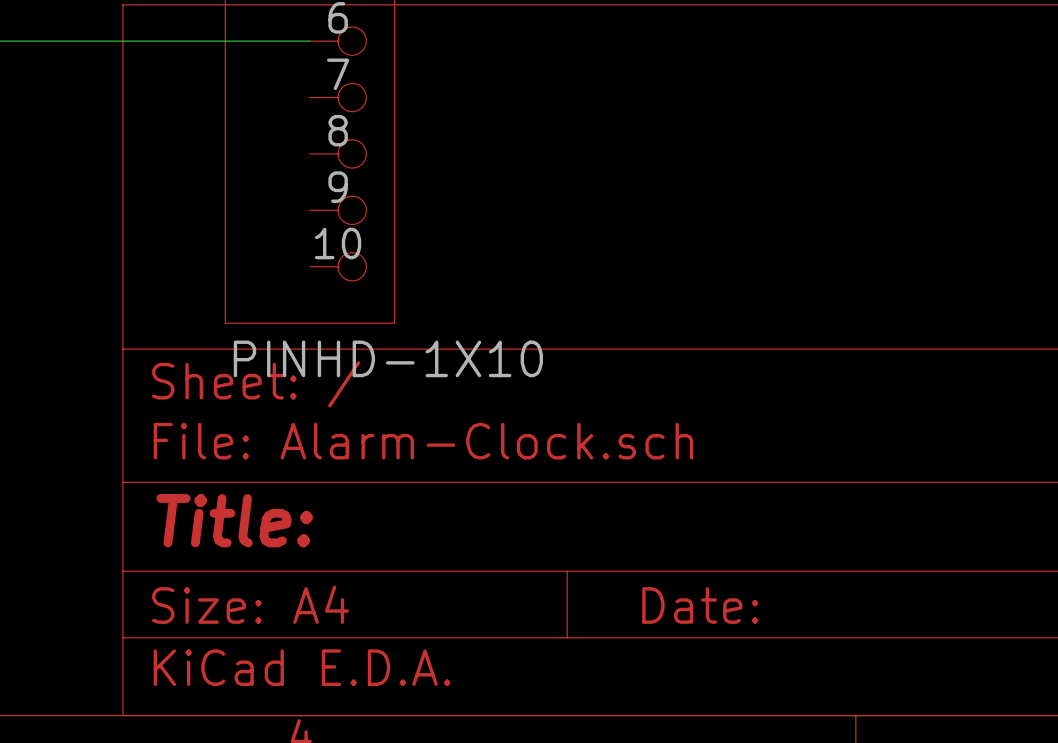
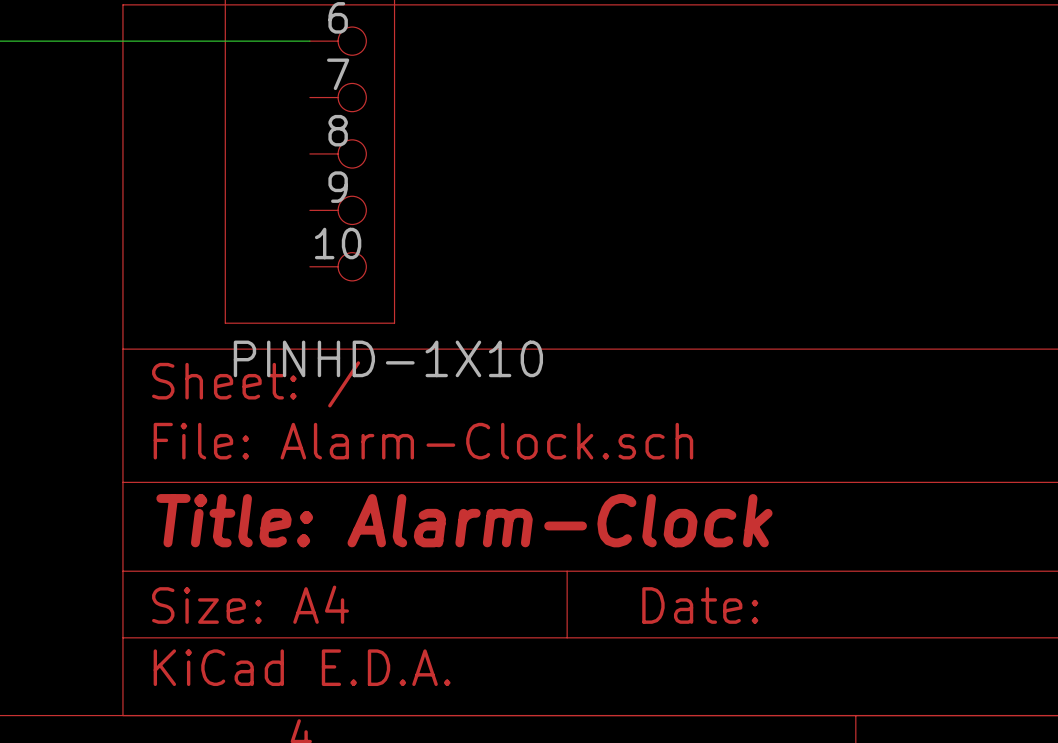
title block: Title: (234, 520) -> Title: Alarm-Clock (464, 520)

